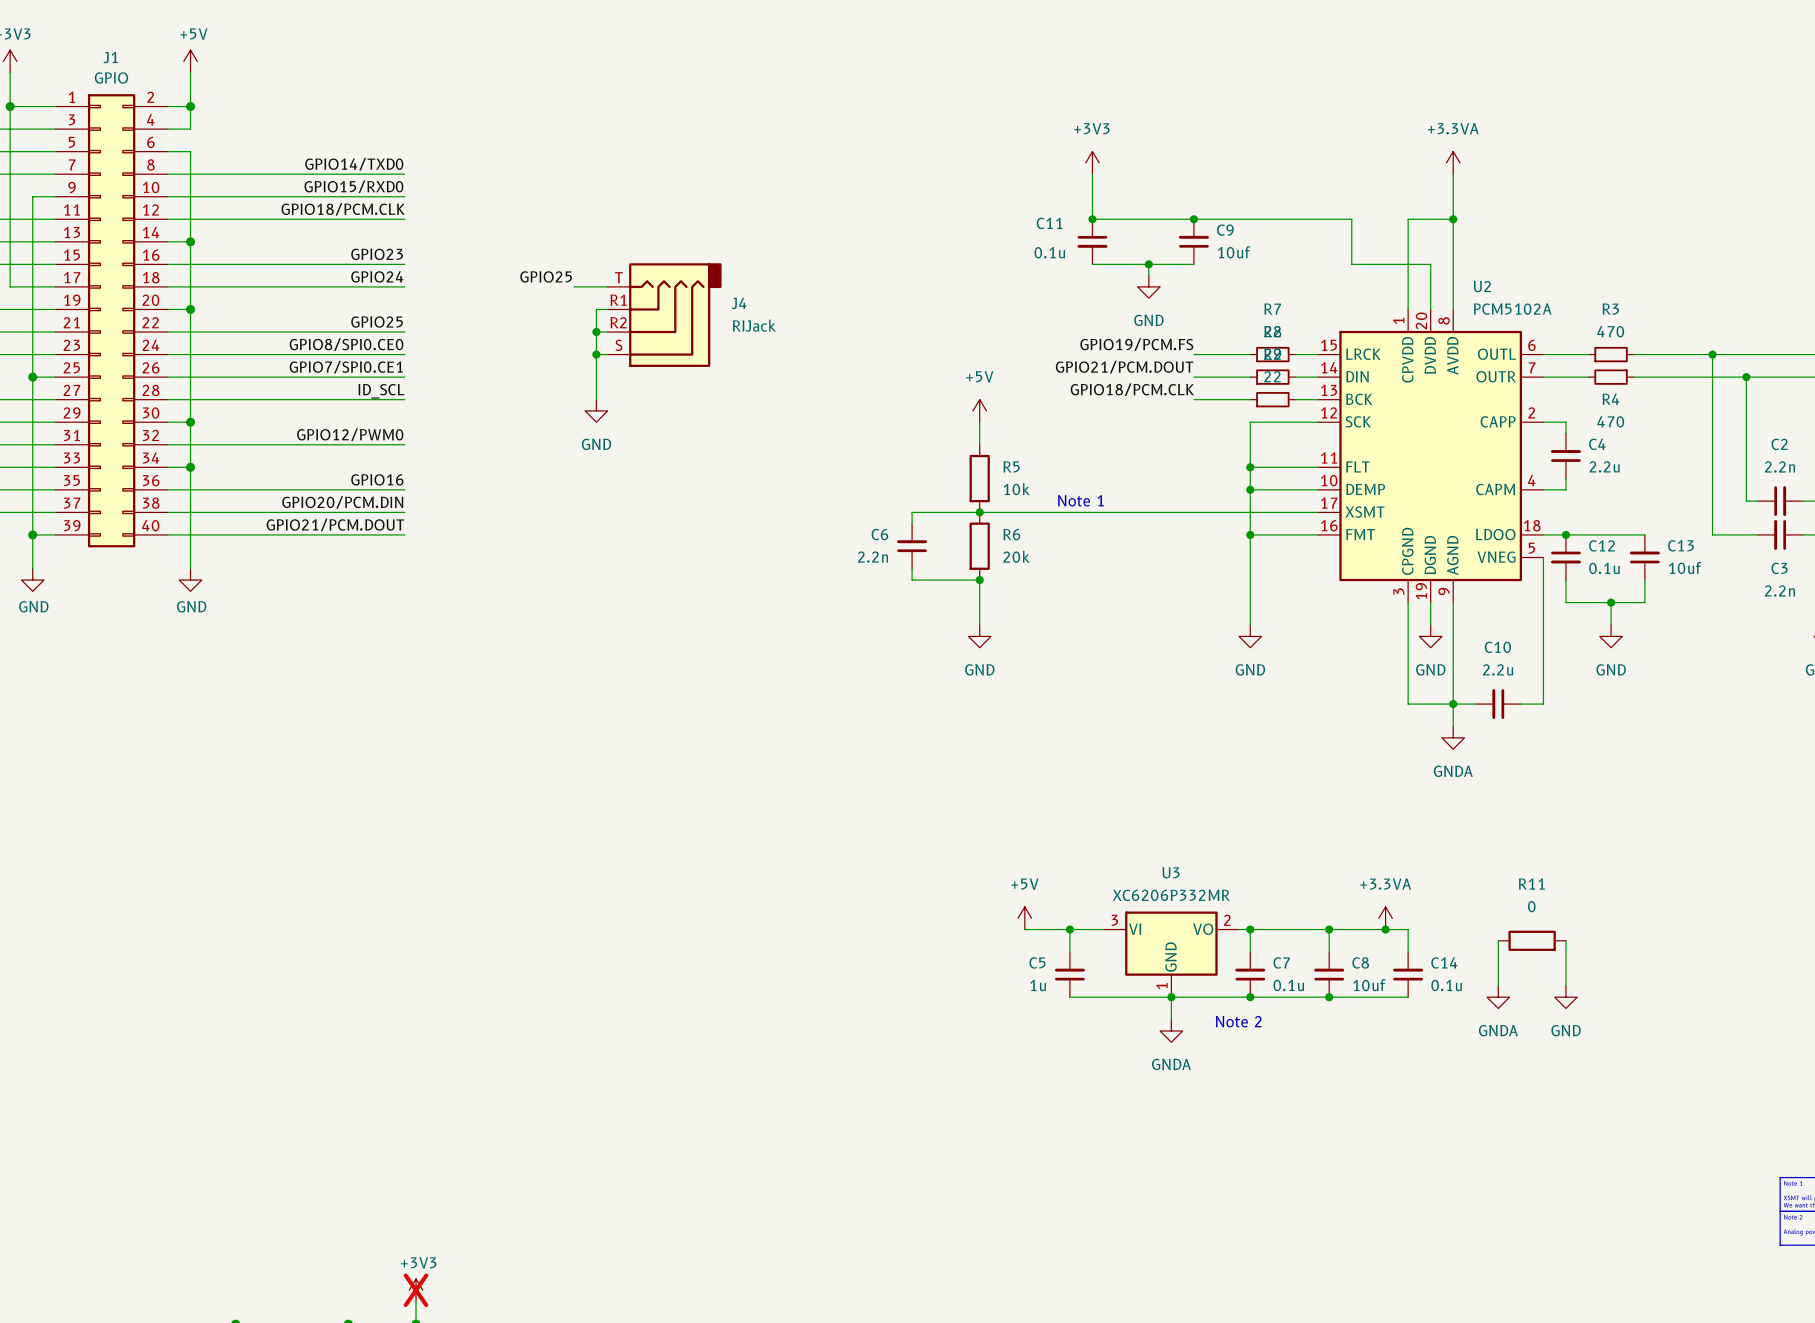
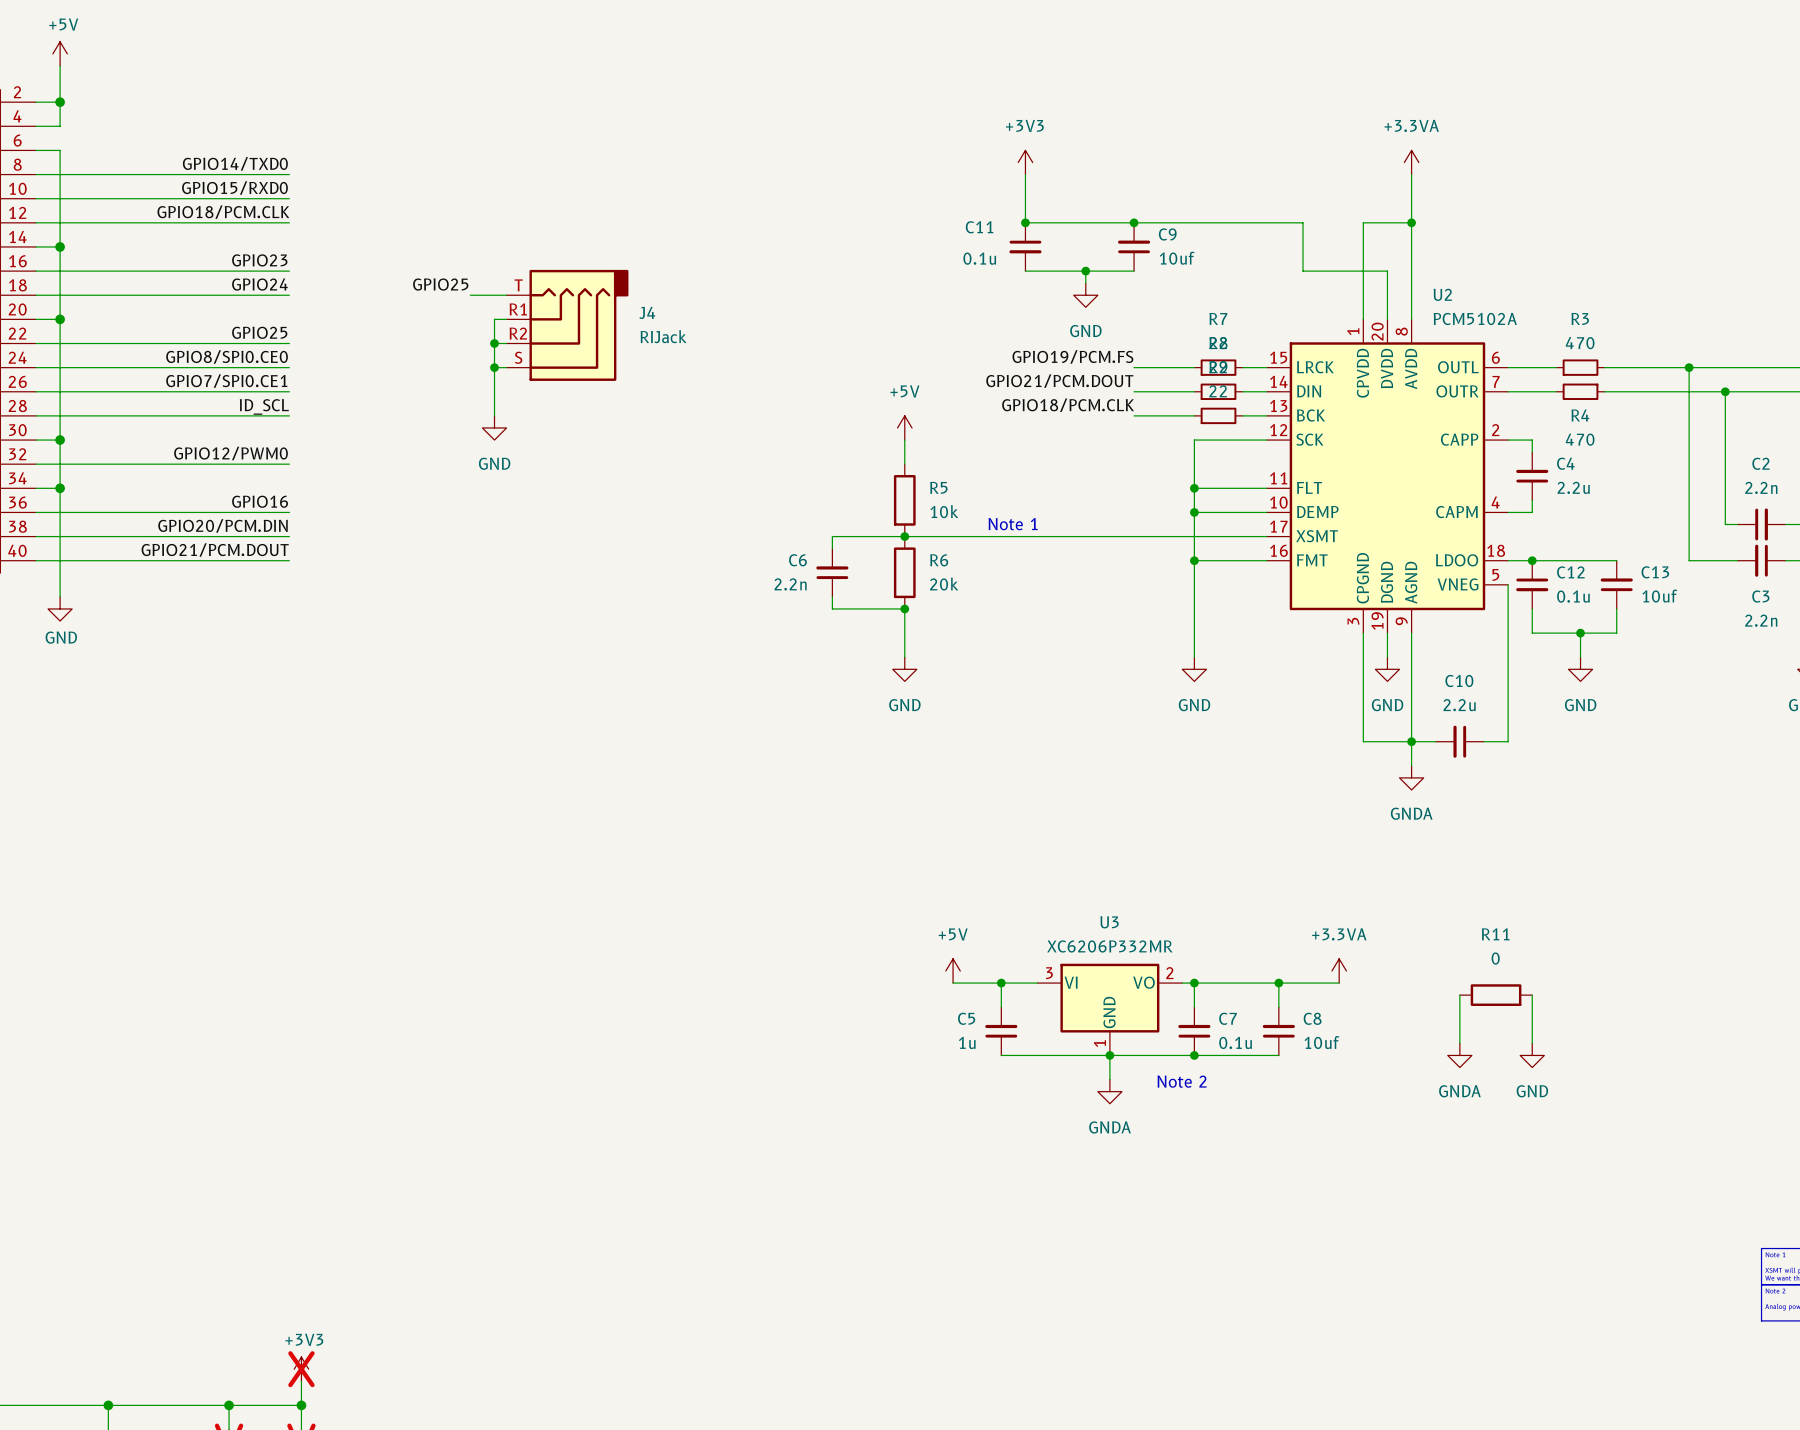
wire: (1385, 929) (1408, 929) (1408, 952) -> none
junction: (1385, 929) -> none
C14: 0.1u (1408, 974) -> none
wire: (1329, 997) (1408, 997) -> none
junction: (1329, 997) -> none

